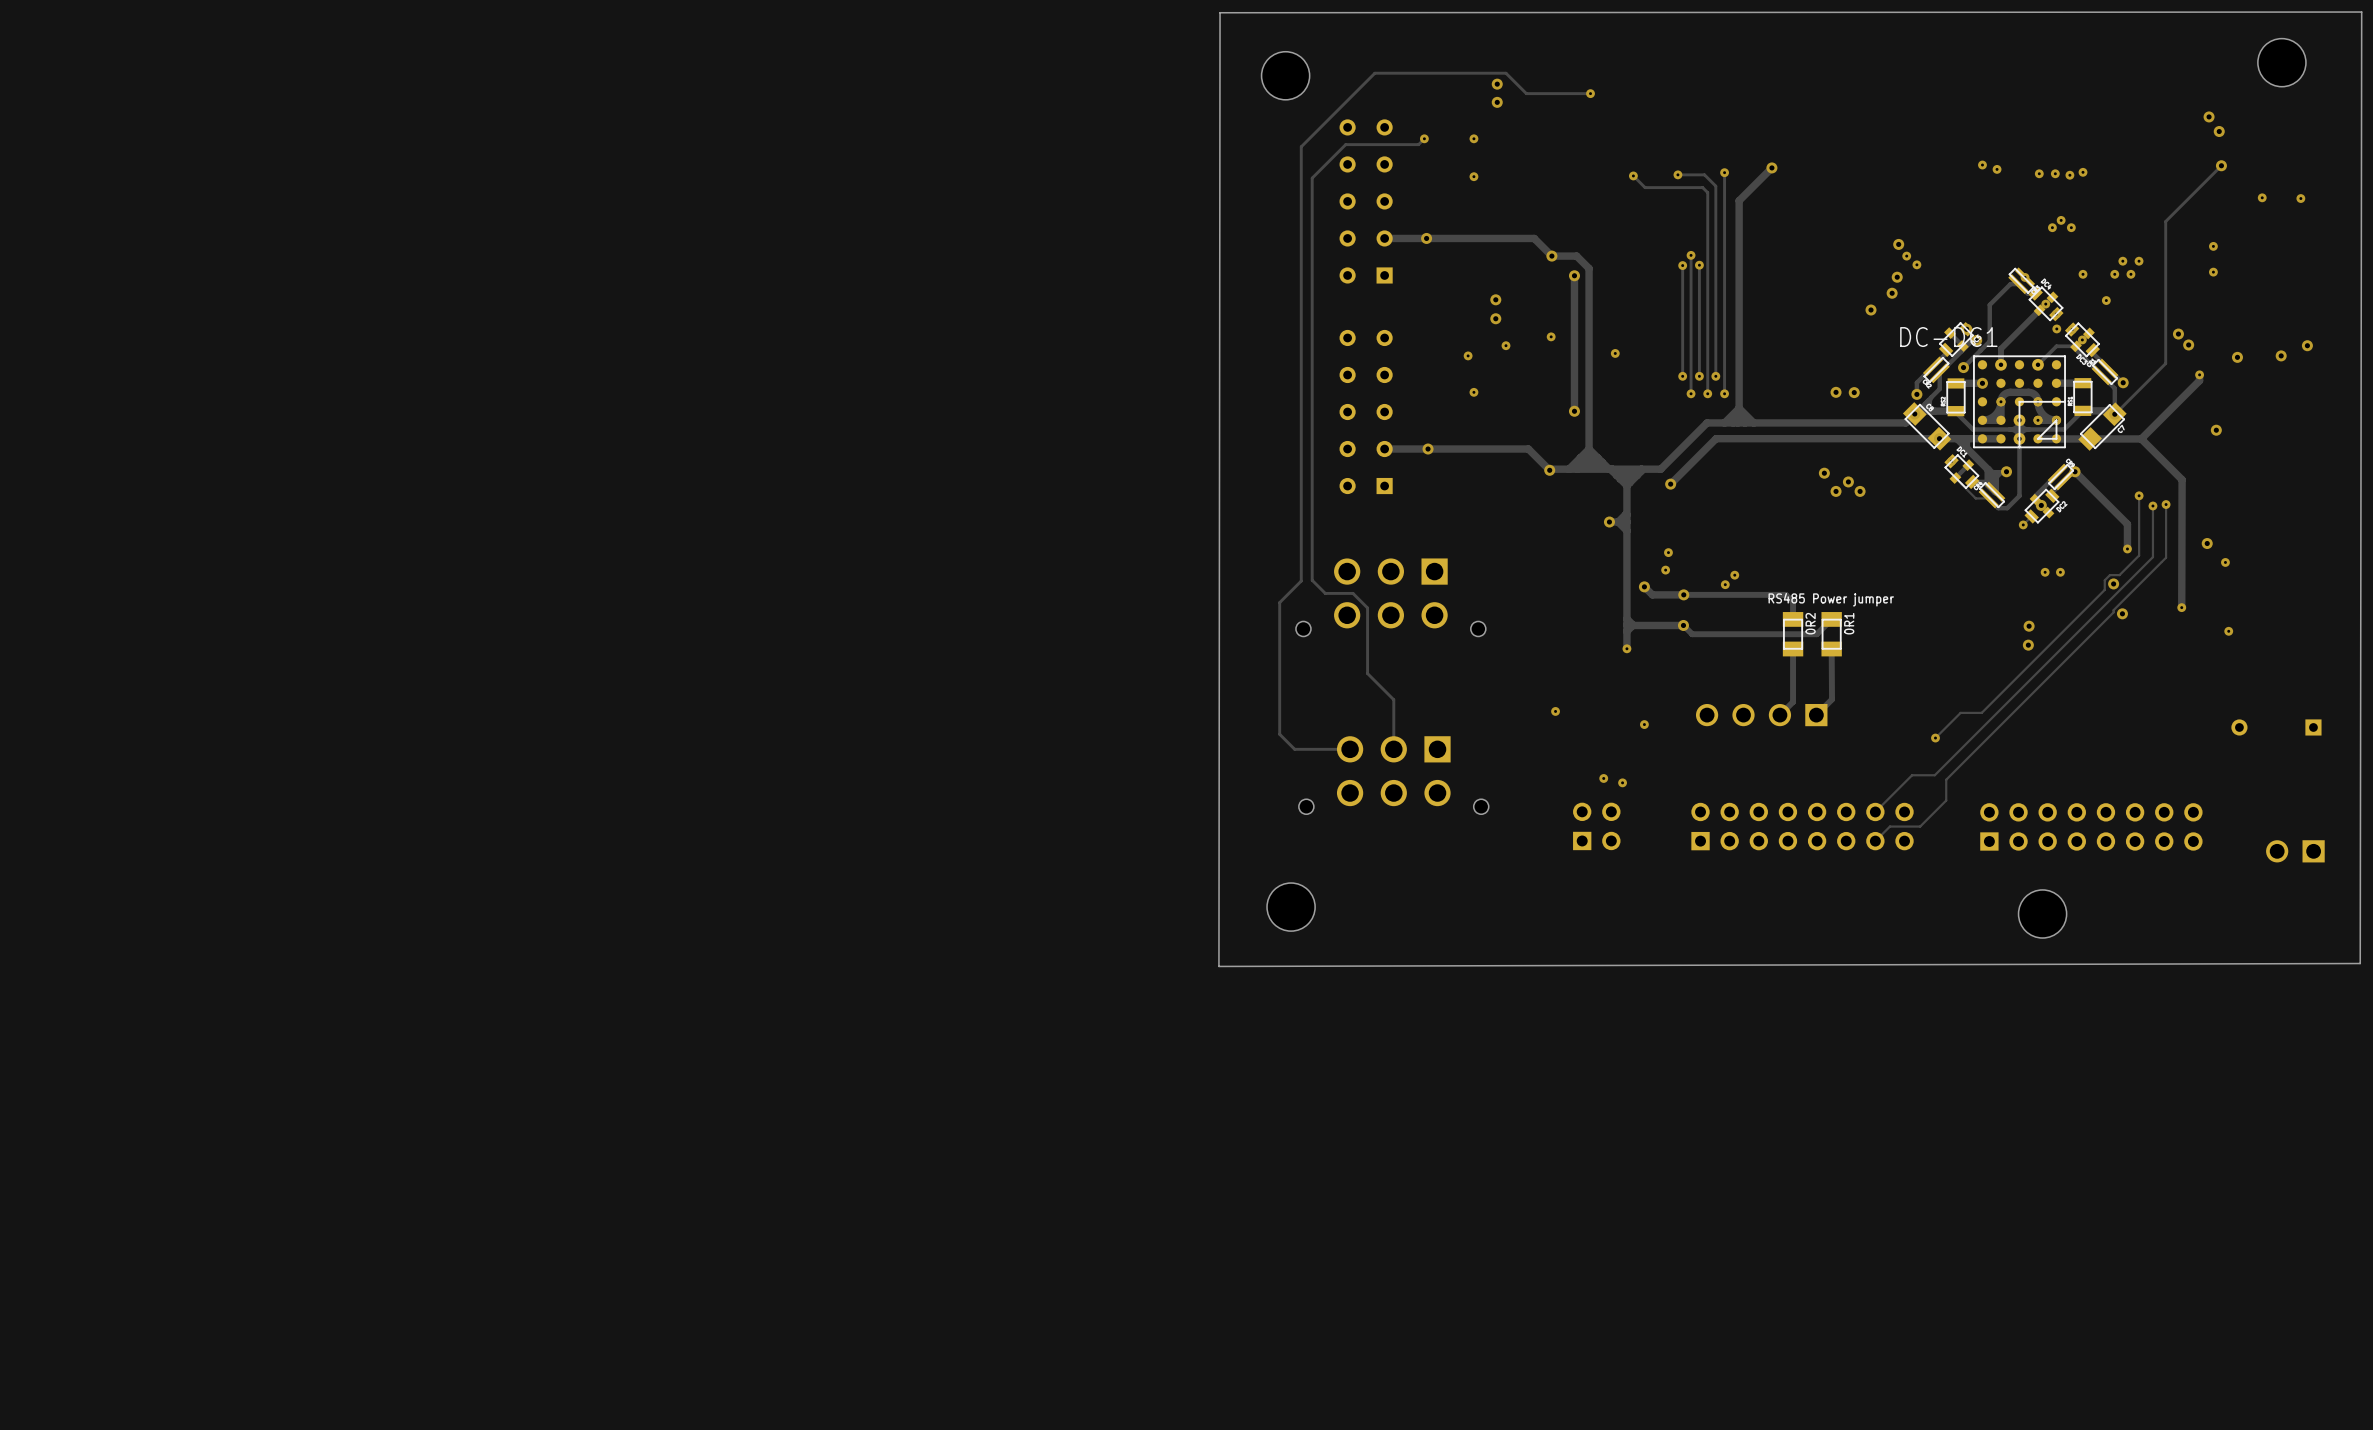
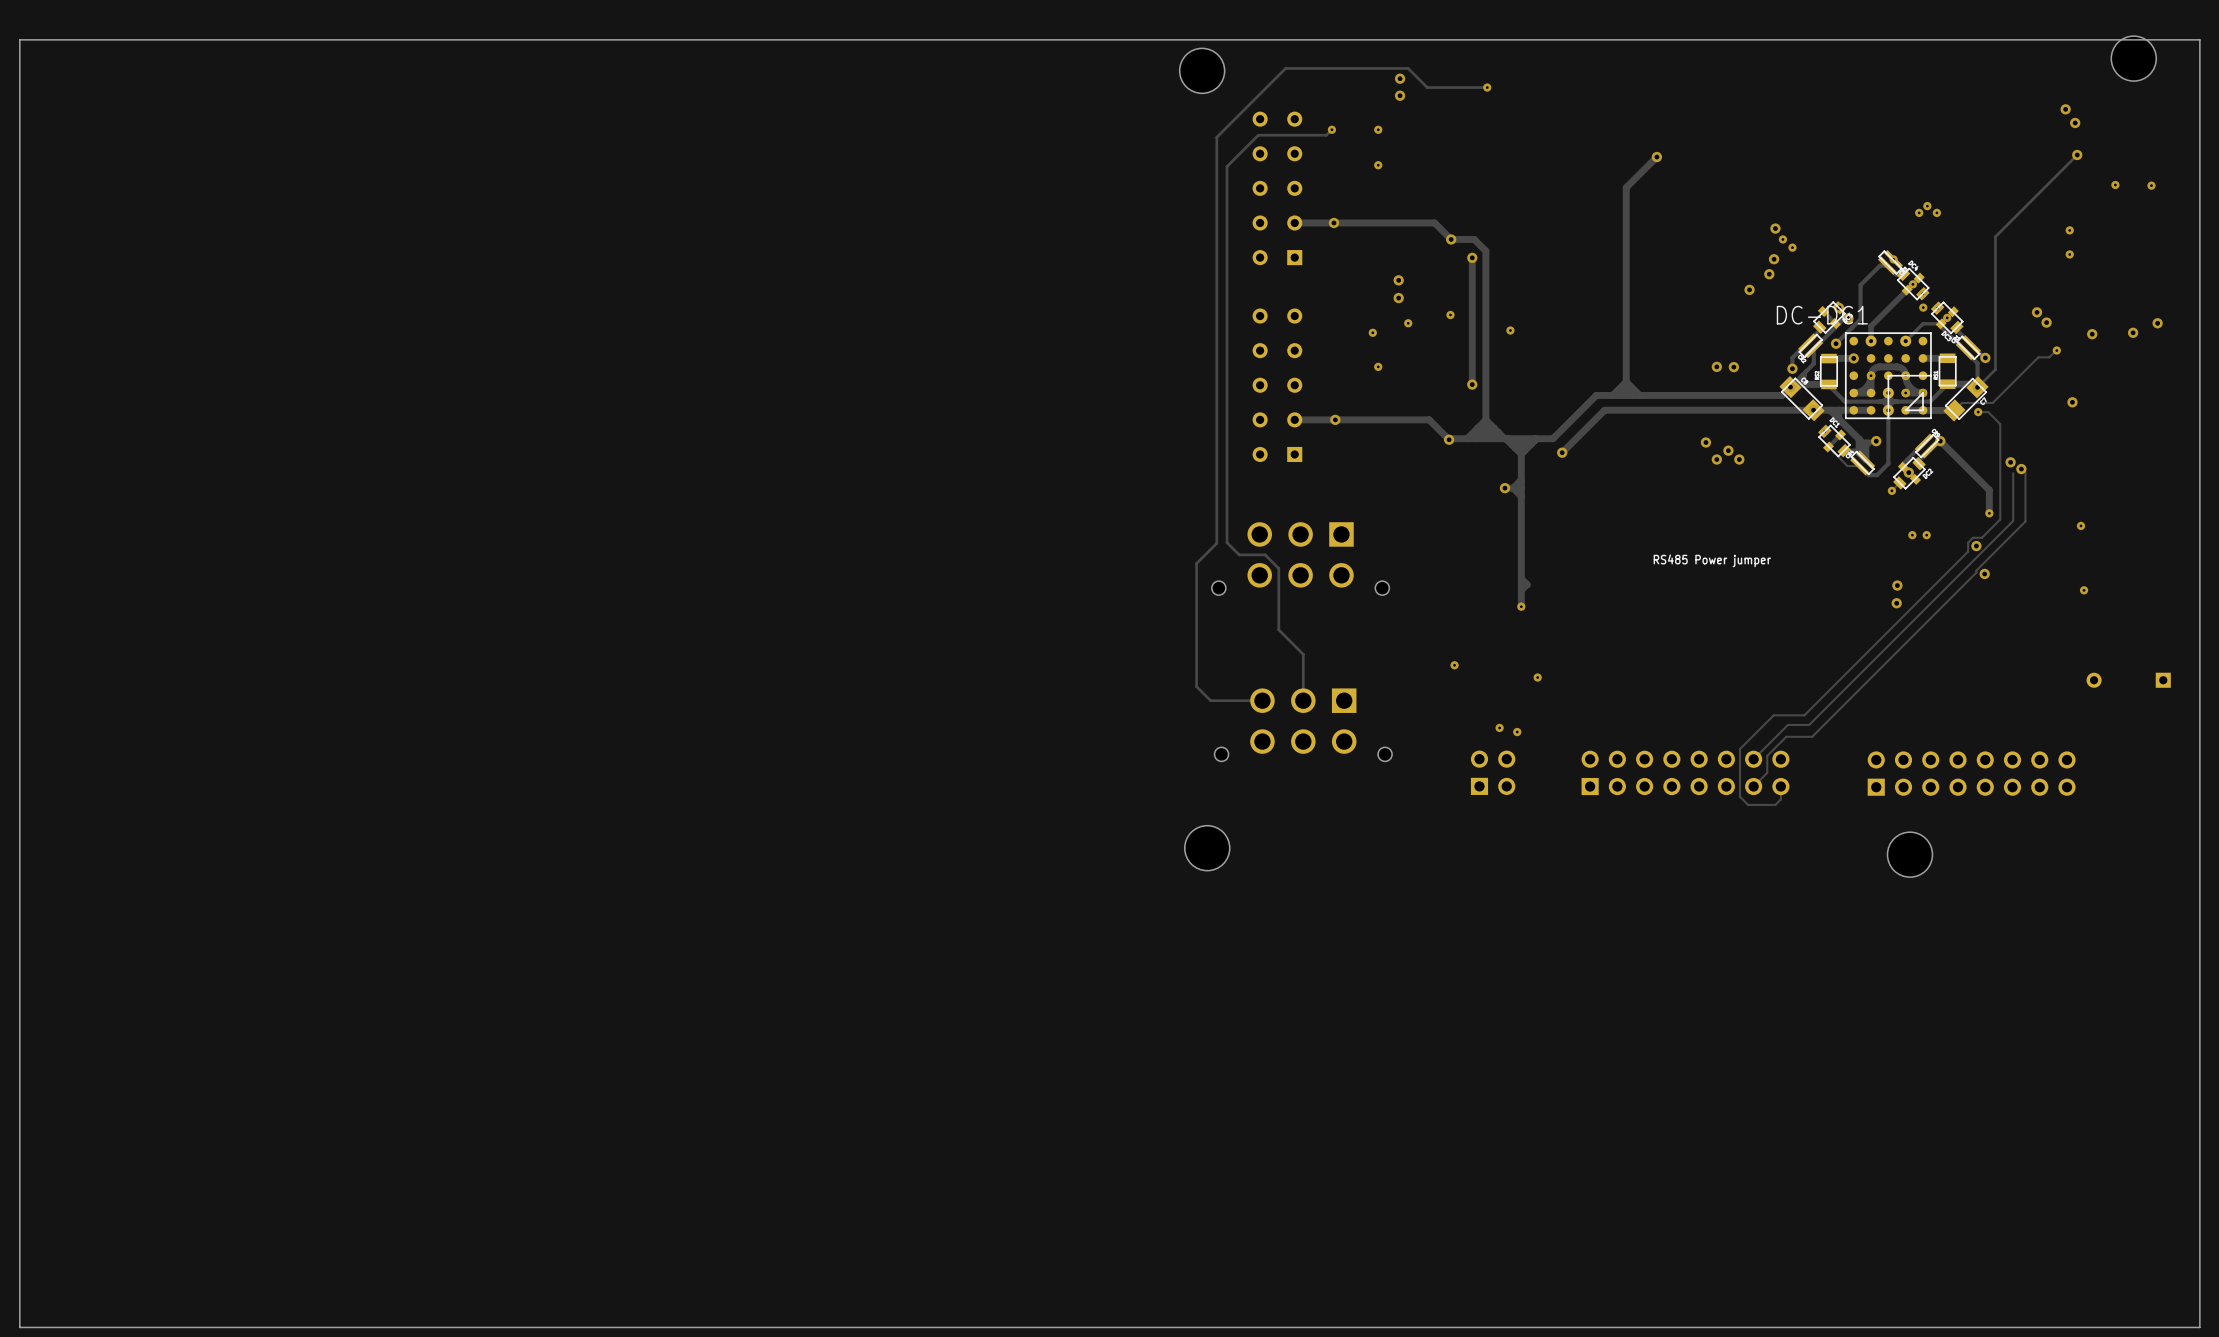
board edge: (2361, 12) (1220, 12) (1218, 966) (2360, 963) (2361, 12) -> none
board edge: none -> (2199, 39) (19, 39) (19, 1327) (2199, 1327) (2199, 39)
via: (1982, 165) -> none
via: (1997, 169) -> none
track: (1724, 172) (1724, 393) -> none
via: (1724, 172) -> none
via: (2083, 172) -> none
via: (2039, 173) -> none
via: (2055, 173) -> none
track: (1677, 174) (1704, 174) (1715, 186) (1715, 376) -> none
via: (1677, 174) -> none
track: (1633, 175) (1645, 187) (1702, 187) (1707, 192) (1707, 393) -> none
via: (1633, 175) -> none
via: (2069, 175) -> none
track: (2165, 221) (2165, 363) (2134, 395) -> (2025, 207) (1995, 236) (1995, 369)
track: (1691, 255) (1691, 393) -> none
via: (1691, 255) -> none
via: (2122, 261) -> none
via: (2139, 261) -> none
track: (1682, 265) (1682, 376) -> none
via: (1682, 265) -> none
track: (1699, 265) (1699, 376) -> none
via: (1699, 265) -> none
via: (2083, 274) -> none
via: (2114, 274) -> none
via: (2130, 274) -> none
via: (2106, 300) -> none
track: (2199, 374) (2199, 380) (2141, 438) -> none
via: (1682, 376) -> none
via: (1699, 376) -> none
via: (1715, 376) -> none
via: (1691, 393) -> none
via: (1707, 393) -> none
via: (1724, 393) -> none
track: (2141, 438) (2090, 438) -> (2056, 350) (2049, 357) (2038, 357) (1992, 402) (1961, 402) (1954, 410)
track: (2141, 438) (2182, 479) (2181, 607) -> none
track: none -> (1978, 412) (1988, 412) (2000, 424) (2000, 463)
via: none -> (1978, 412)
via: none -> (2010, 462)
via: (2139, 495) -> none
via: none -> (2021, 469)
via: (2166, 504) -> none
via: (2152, 505) -> none
via: (2207, 543) -> none
via: (1668, 552) -> none
via: (1665, 570) -> none
via: (1734, 575) -> none
via: (1725, 584) -> none
track: (1644, 586) (1652, 594) (1785, 594) (1793, 602) (1793, 619) -> none
via: (1644, 586) -> none
via: (1683, 594) -> none
via: (2181, 607) -> none
track: (1831, 619) (1816, 634) (1692, 634) (1683, 625) (1626, 624) -> none
via: (1683, 625) -> none
0R2: (1793, 634) -> none
0R1: (1831, 634) -> none
track: (1793, 649) (1793, 701) (1779, 715) -> none
track: (1831, 649) (1832, 699) (1816, 715) -> none
track: (1981, 712) (1960, 712) (1935, 738) -> (1853, 666) (1804, 715) (1773, 715) (1740, 749) (1740, 796) (1748, 804) (1775, 804) (1780, 799) (1780, 786)
part: (1761, 715) -> none
via: (1935, 738) -> none
track: (1946, 779) (1946, 800) (1920, 826) (1889, 826) -> (1819, 729) (1812, 736) (1786, 736) (1767, 755) (1767, 772)
part position: (2091, 826) -> (1971, 773)
part: (2295, 851) -> none

